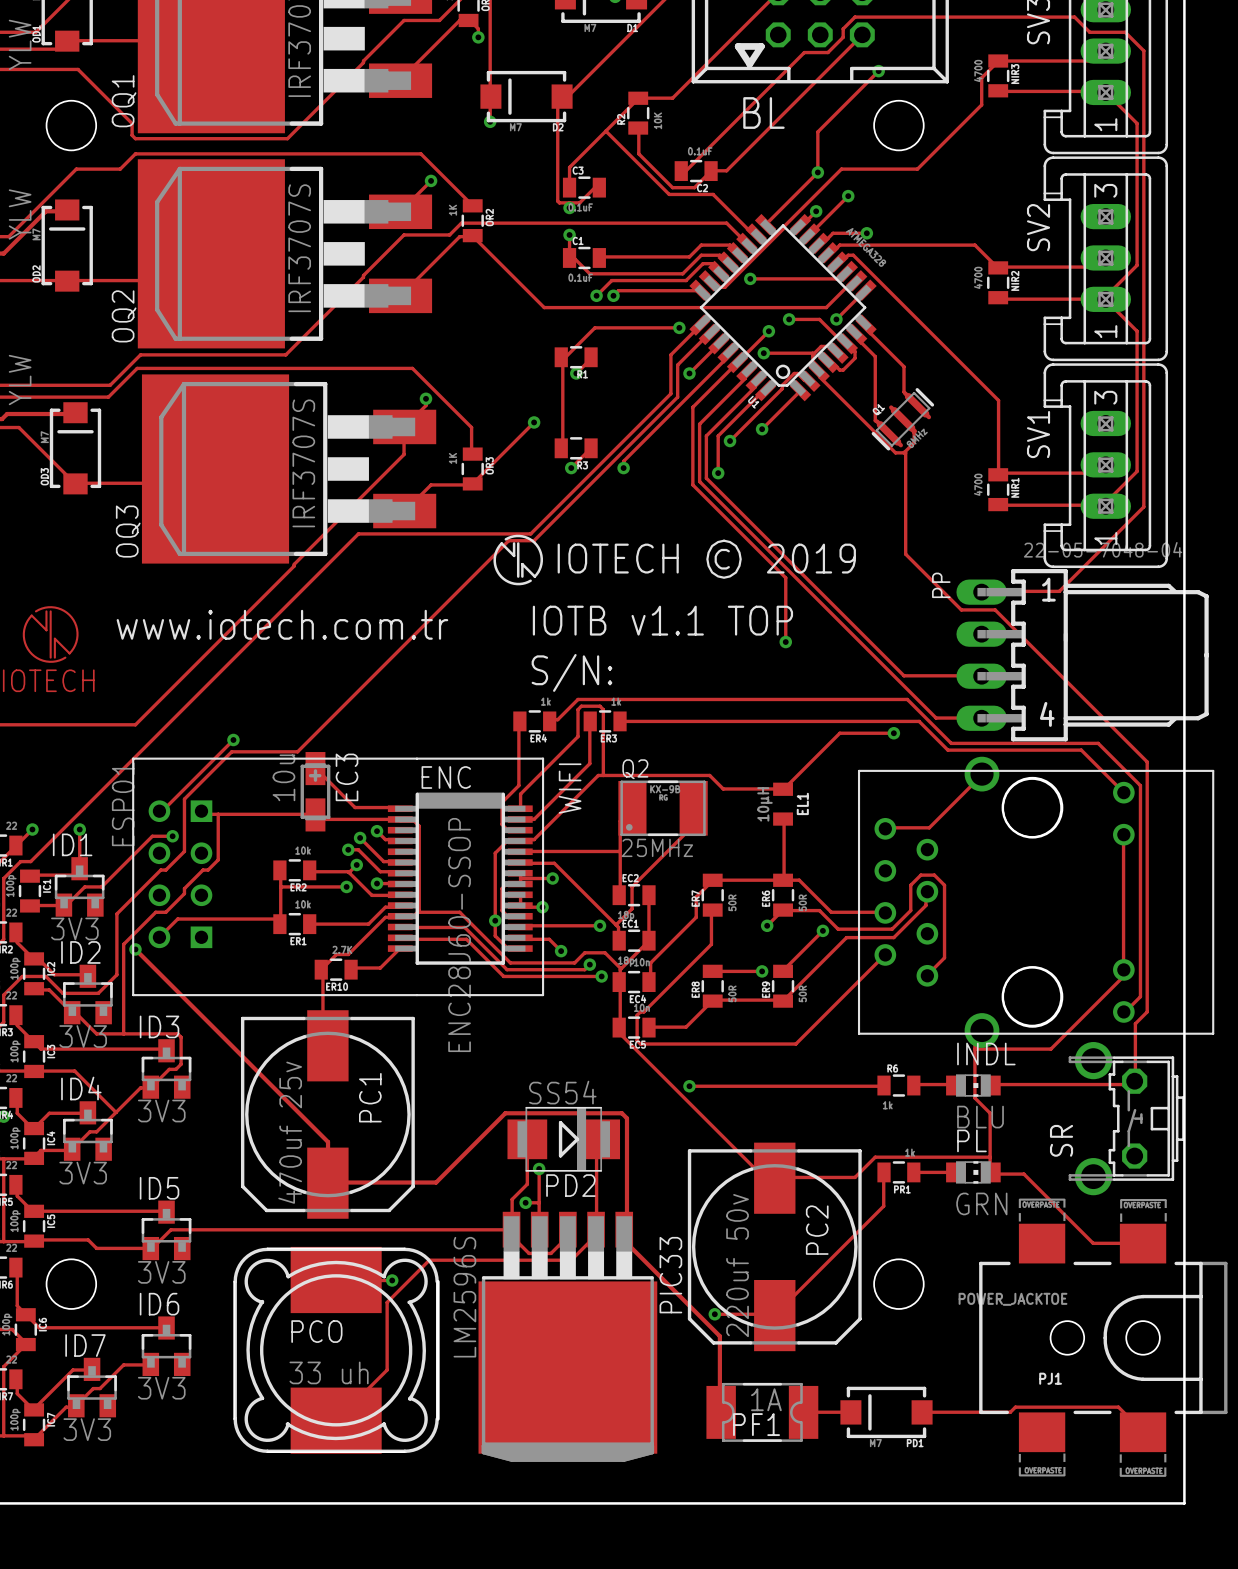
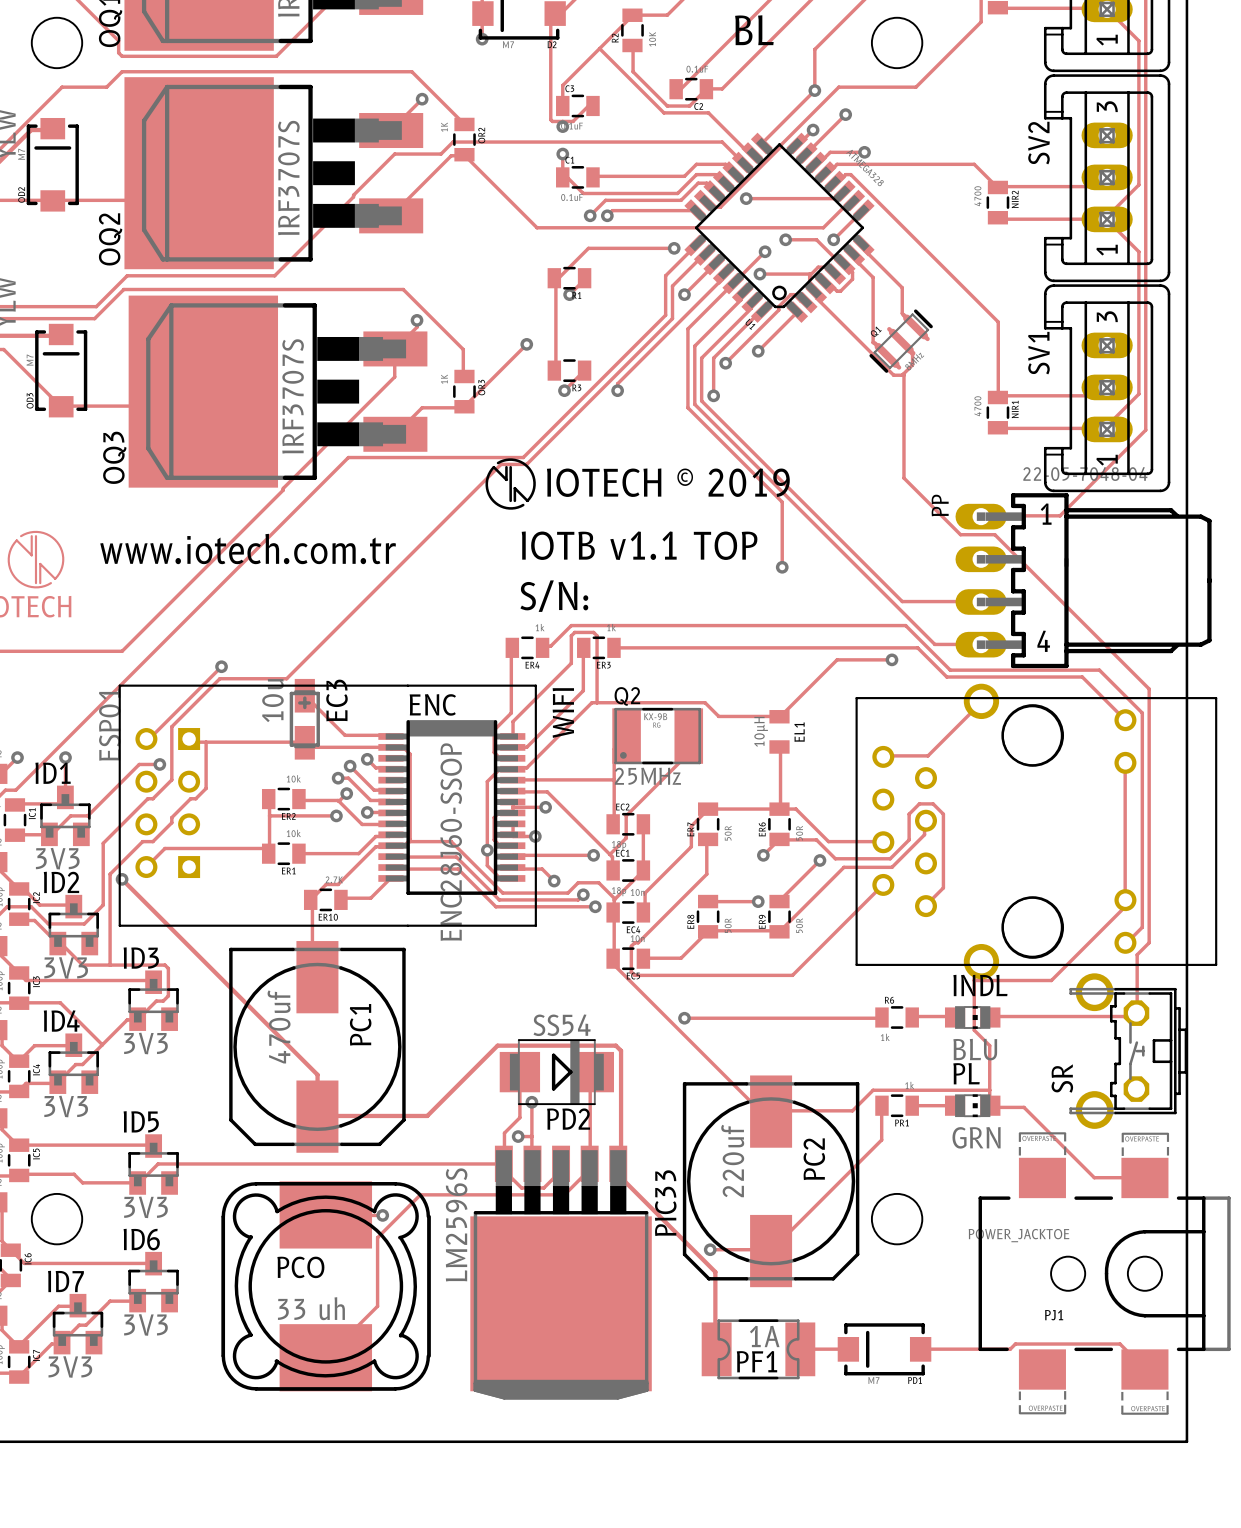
PC1 value: 470uf 25v (290, 1132) -> 470uf (279, 1026)
PC2 value: 220uf 50v (737, 1265) -> 220uf (732, 1161)

